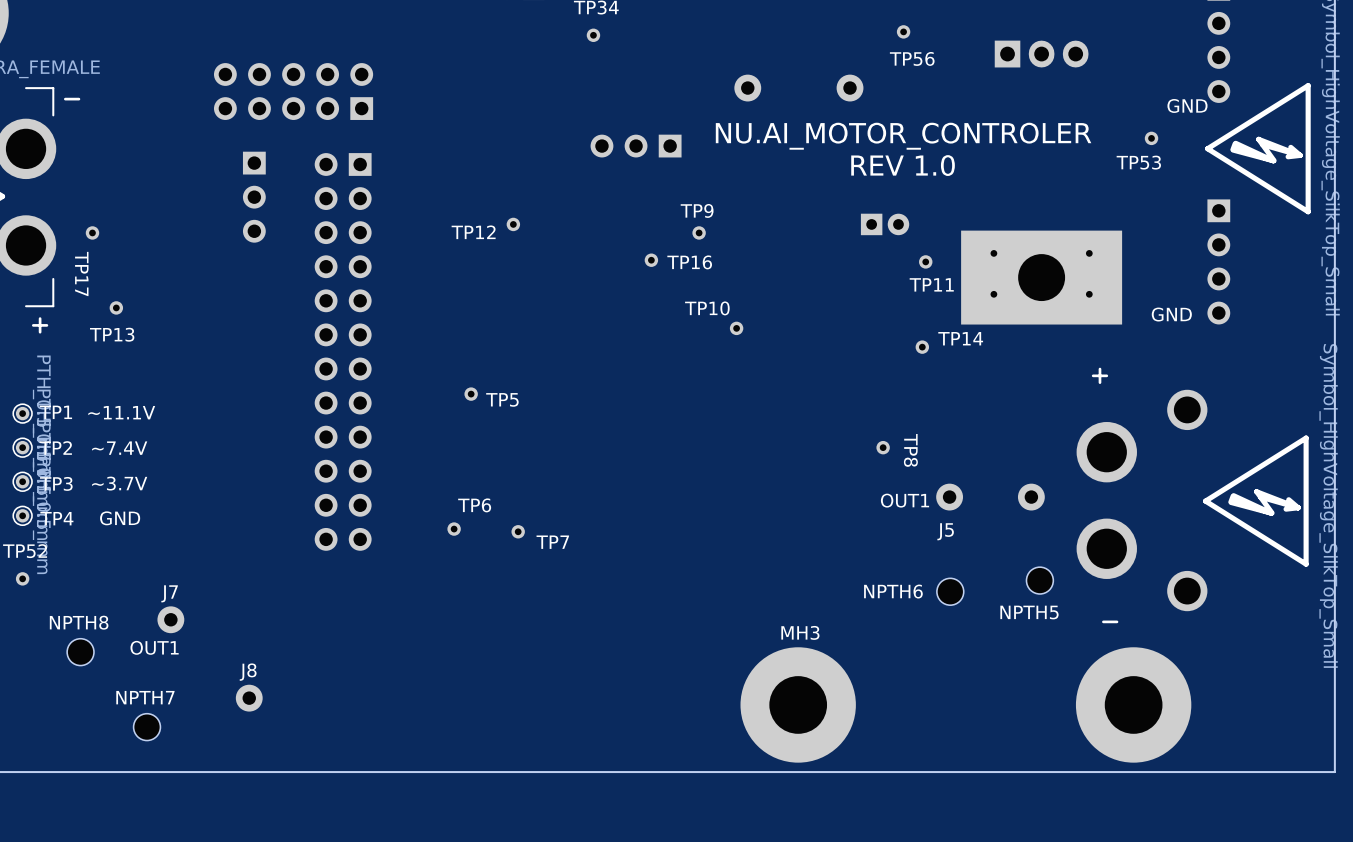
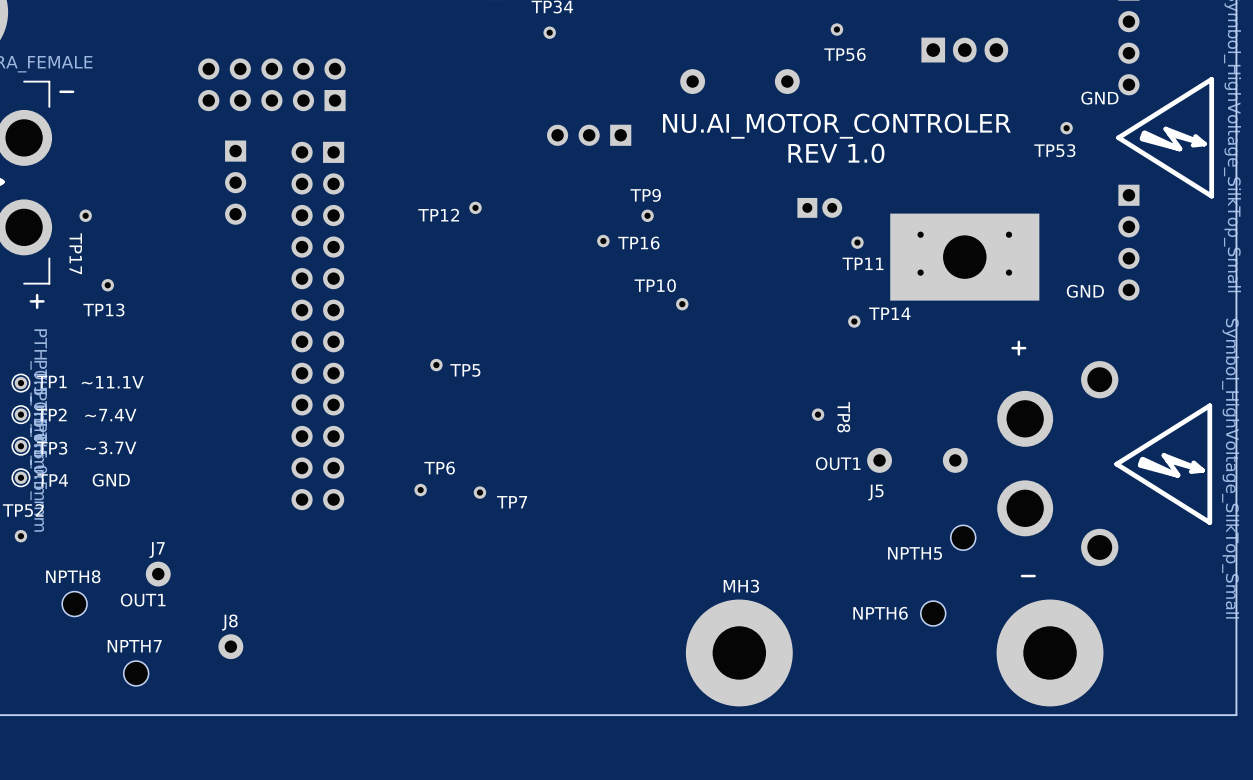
NPTH6 position: (950, 591) -> (933, 613)
NPTH5 name position: NPTH5 (1029, 612) -> NPTH5 (915, 553)

